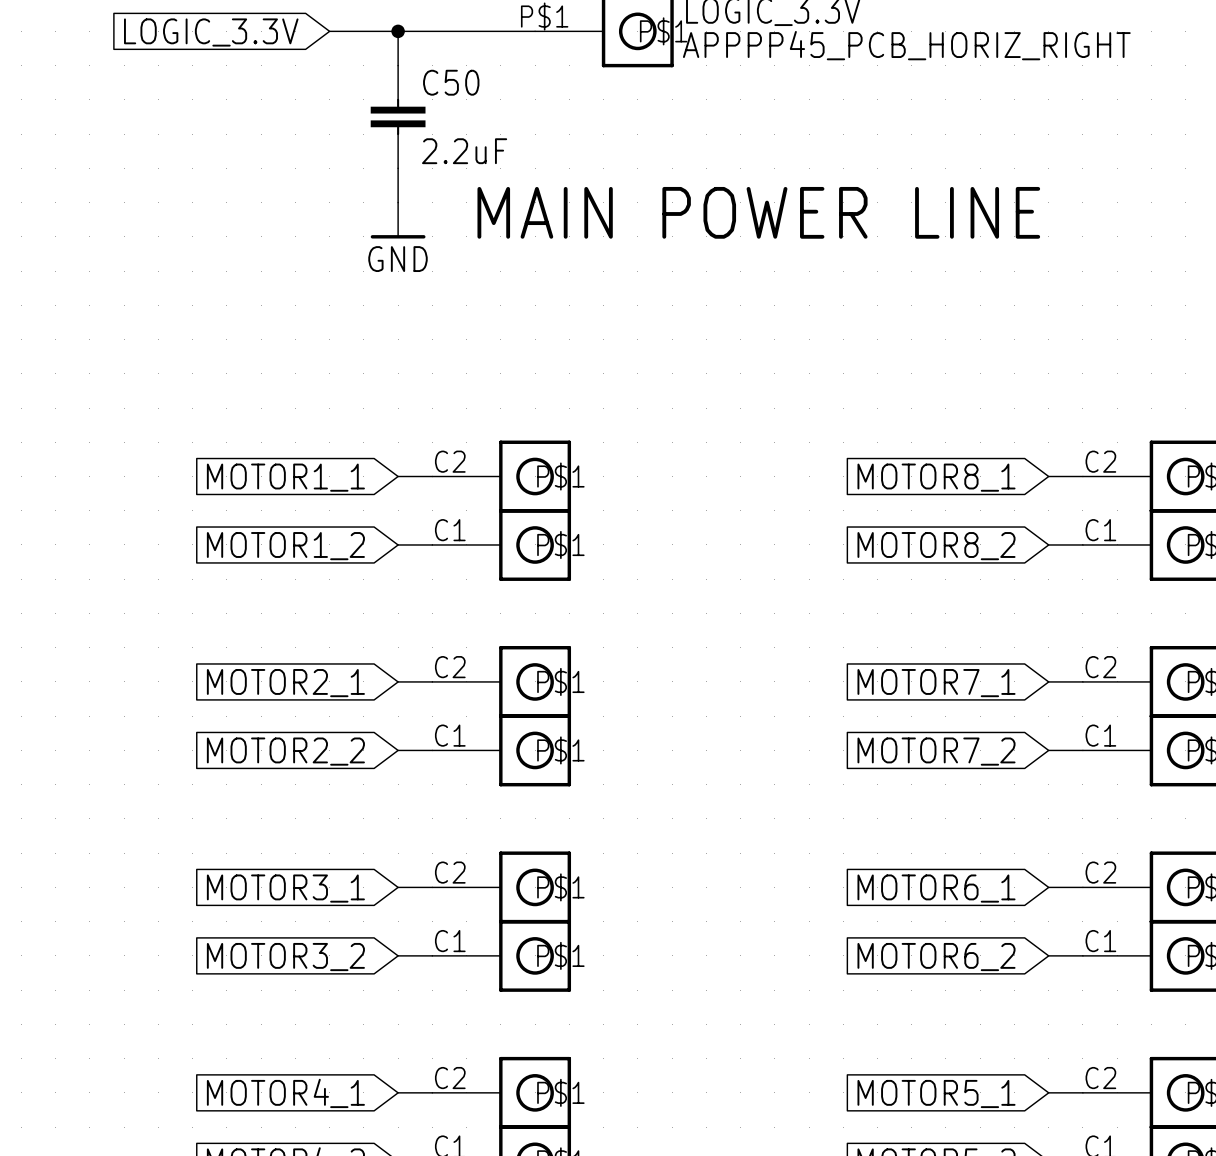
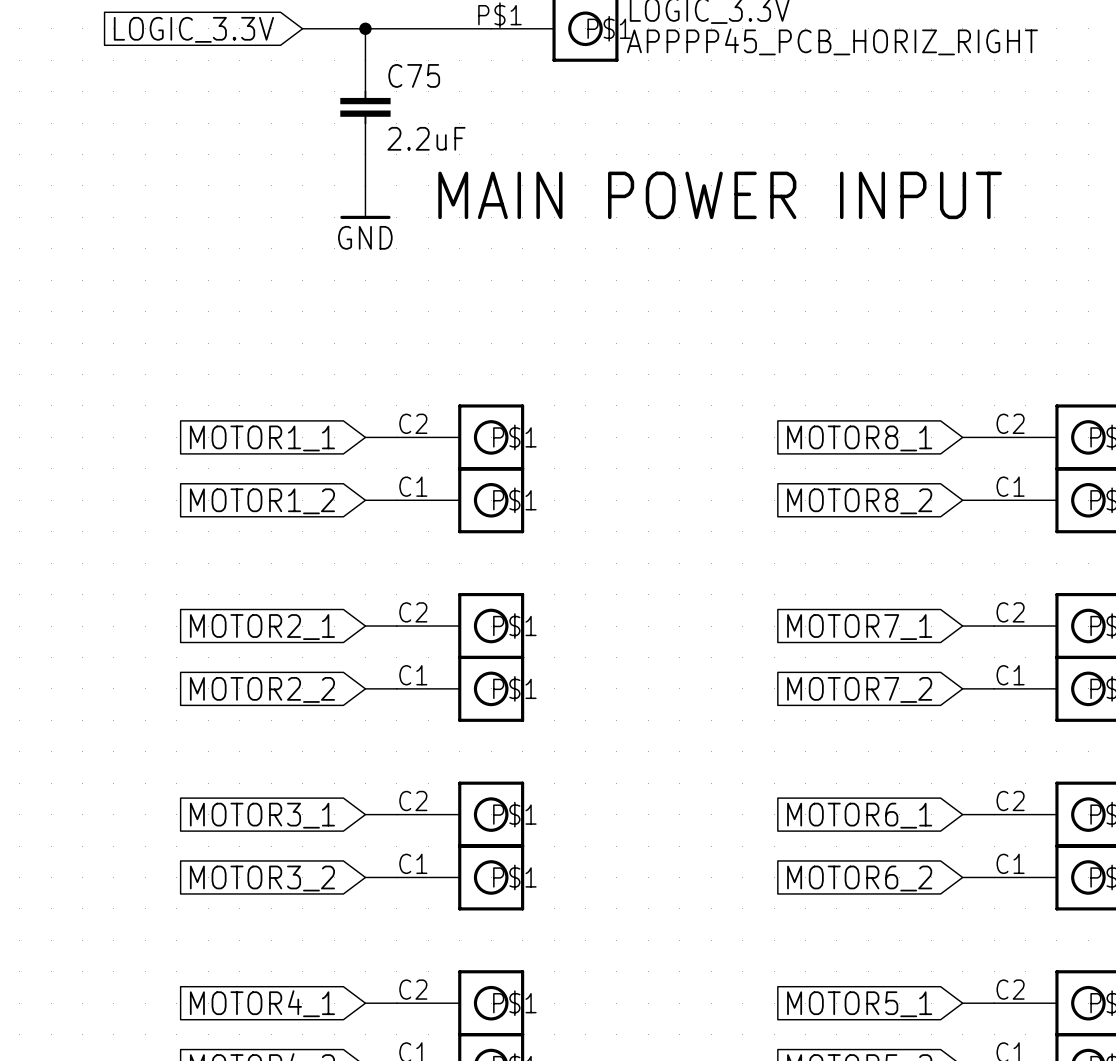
C50 name: C50 (451, 82) -> C75 (414, 75)
text: MAIN POWER LINE (758, 212) -> MAIN POWER INPUT (720, 195)

